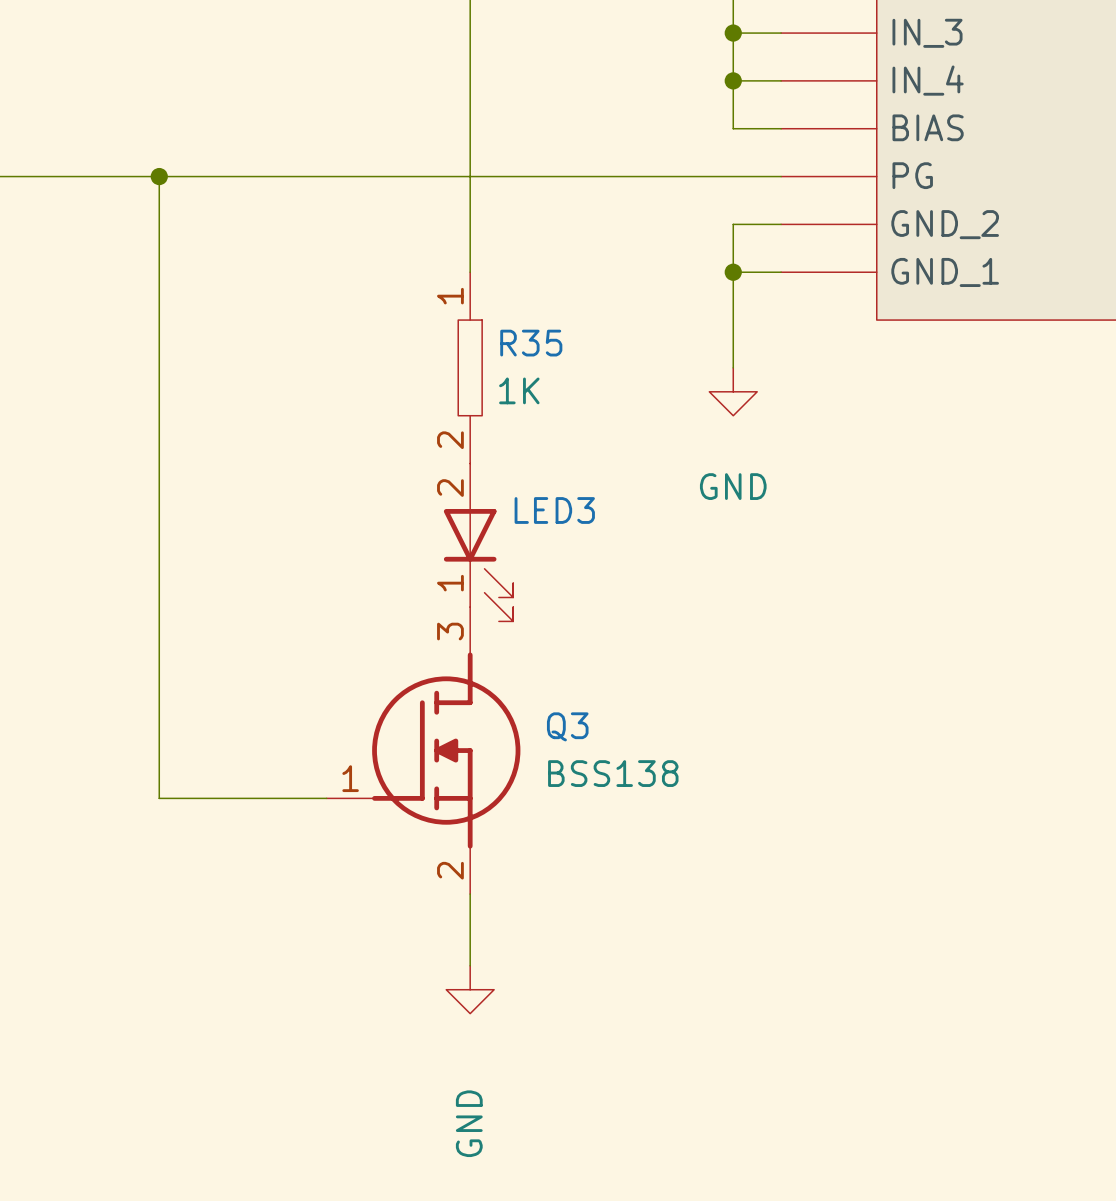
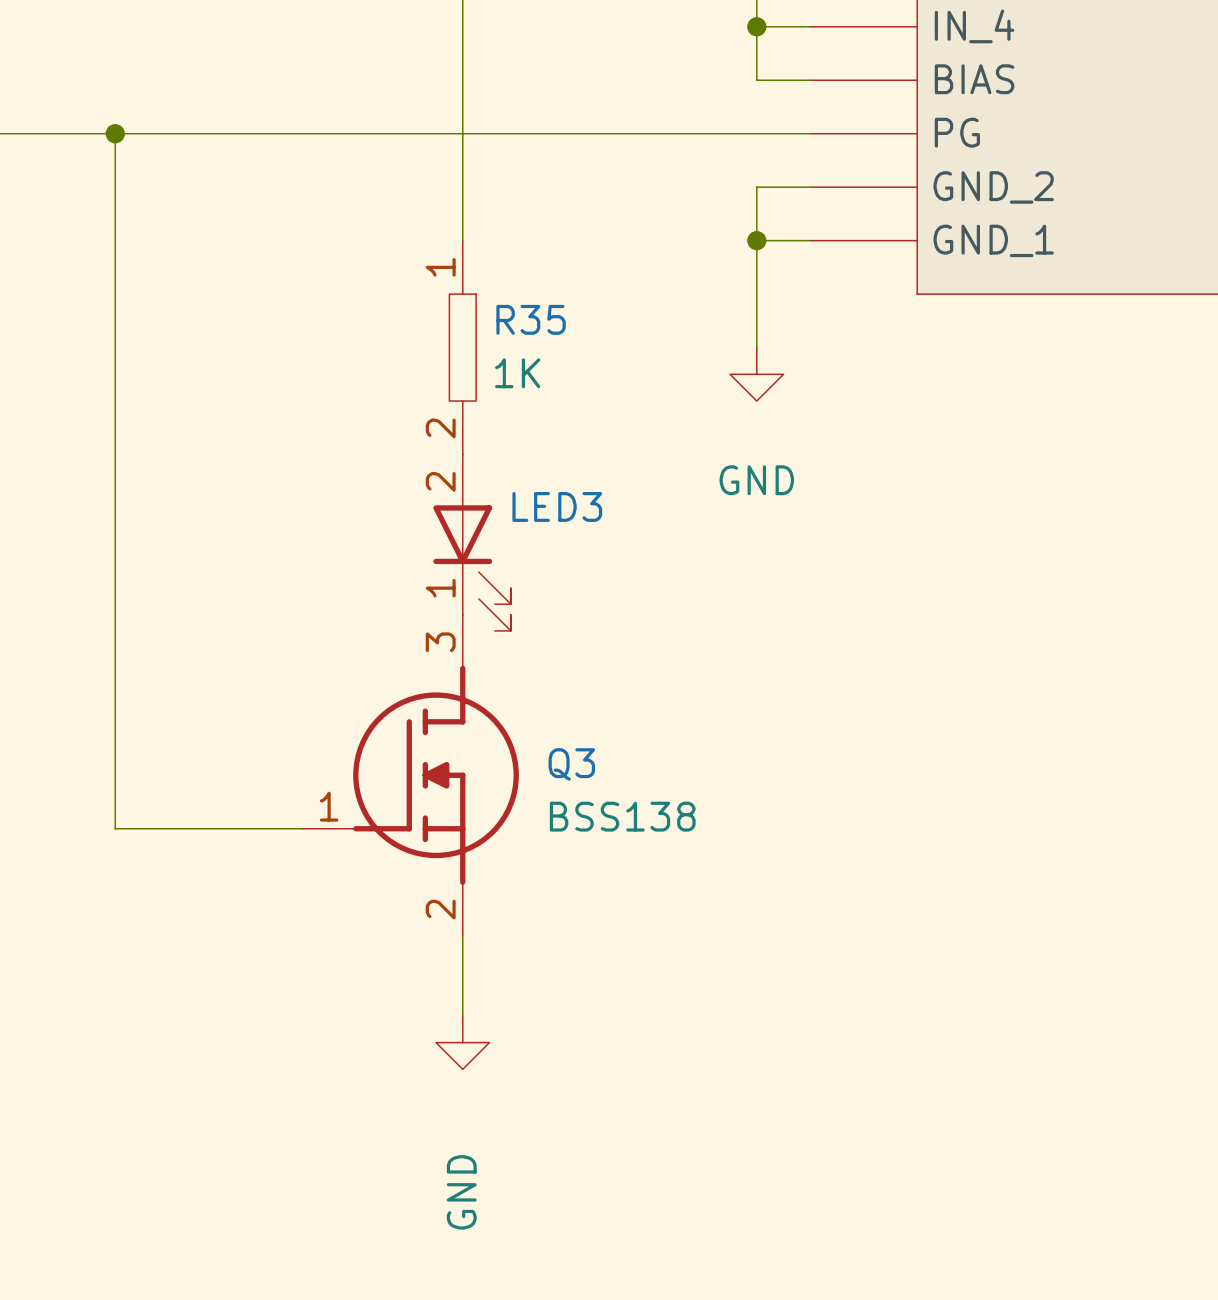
Q3 name position: Q3 (567, 726) -> Q3 (571, 764)
Q3 value position: BSS138 (613, 773) -> BSS138 (622, 816)

